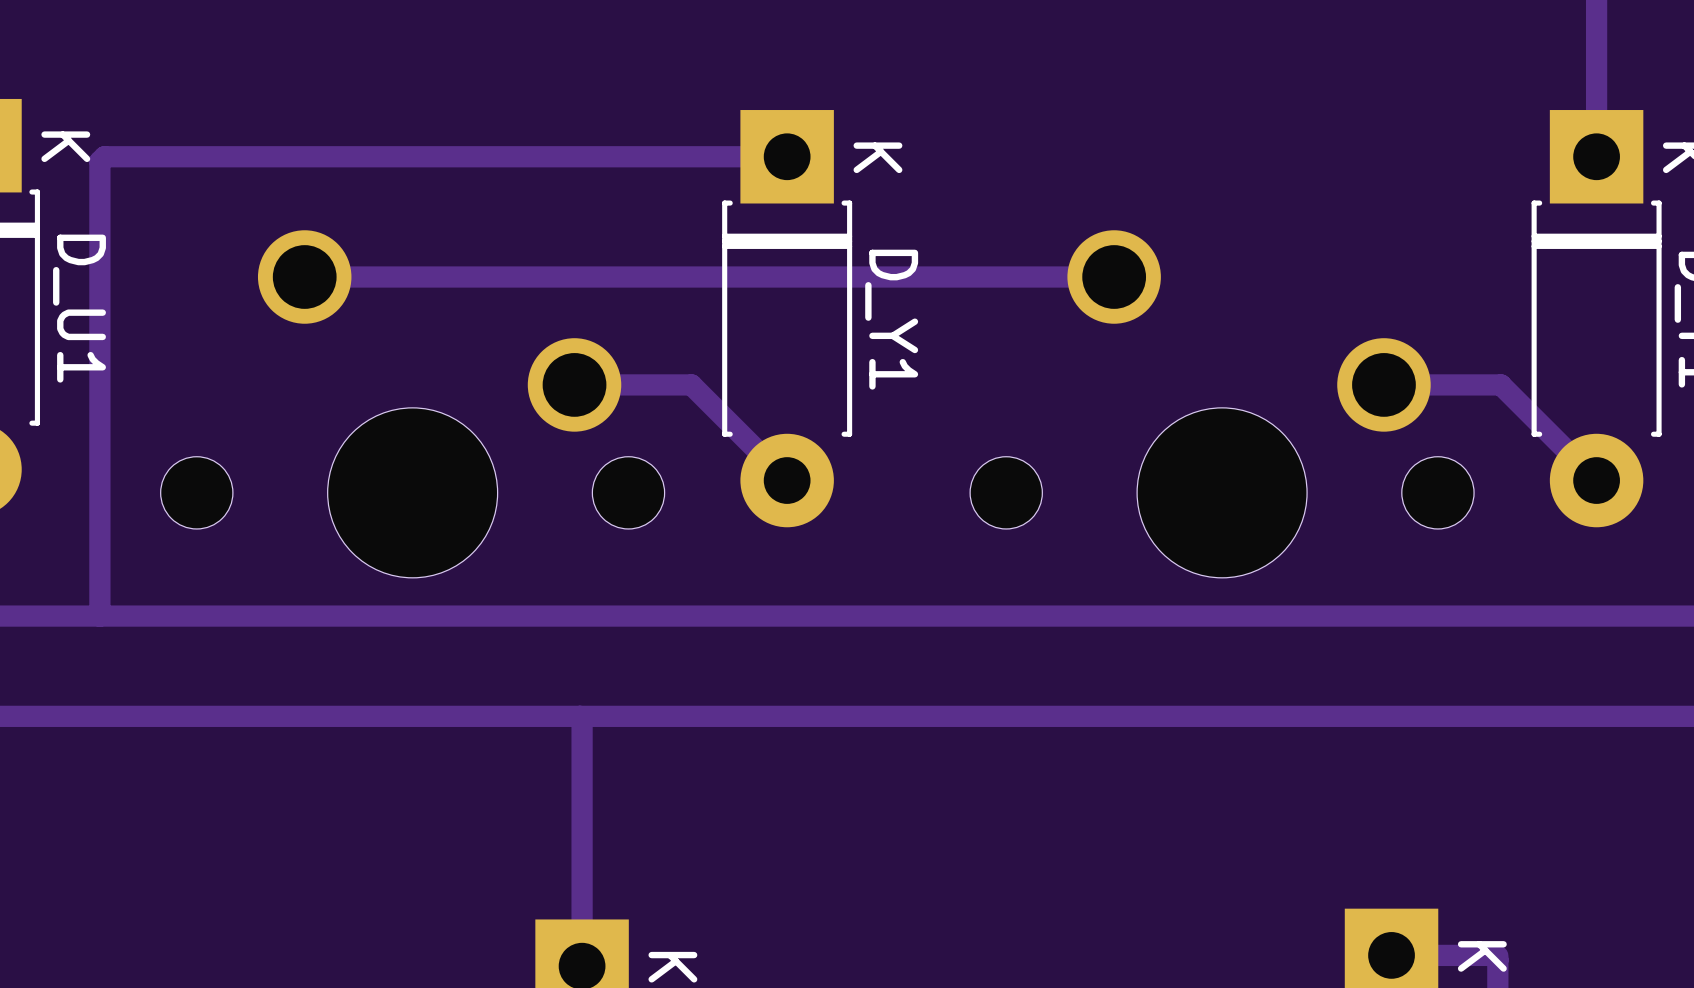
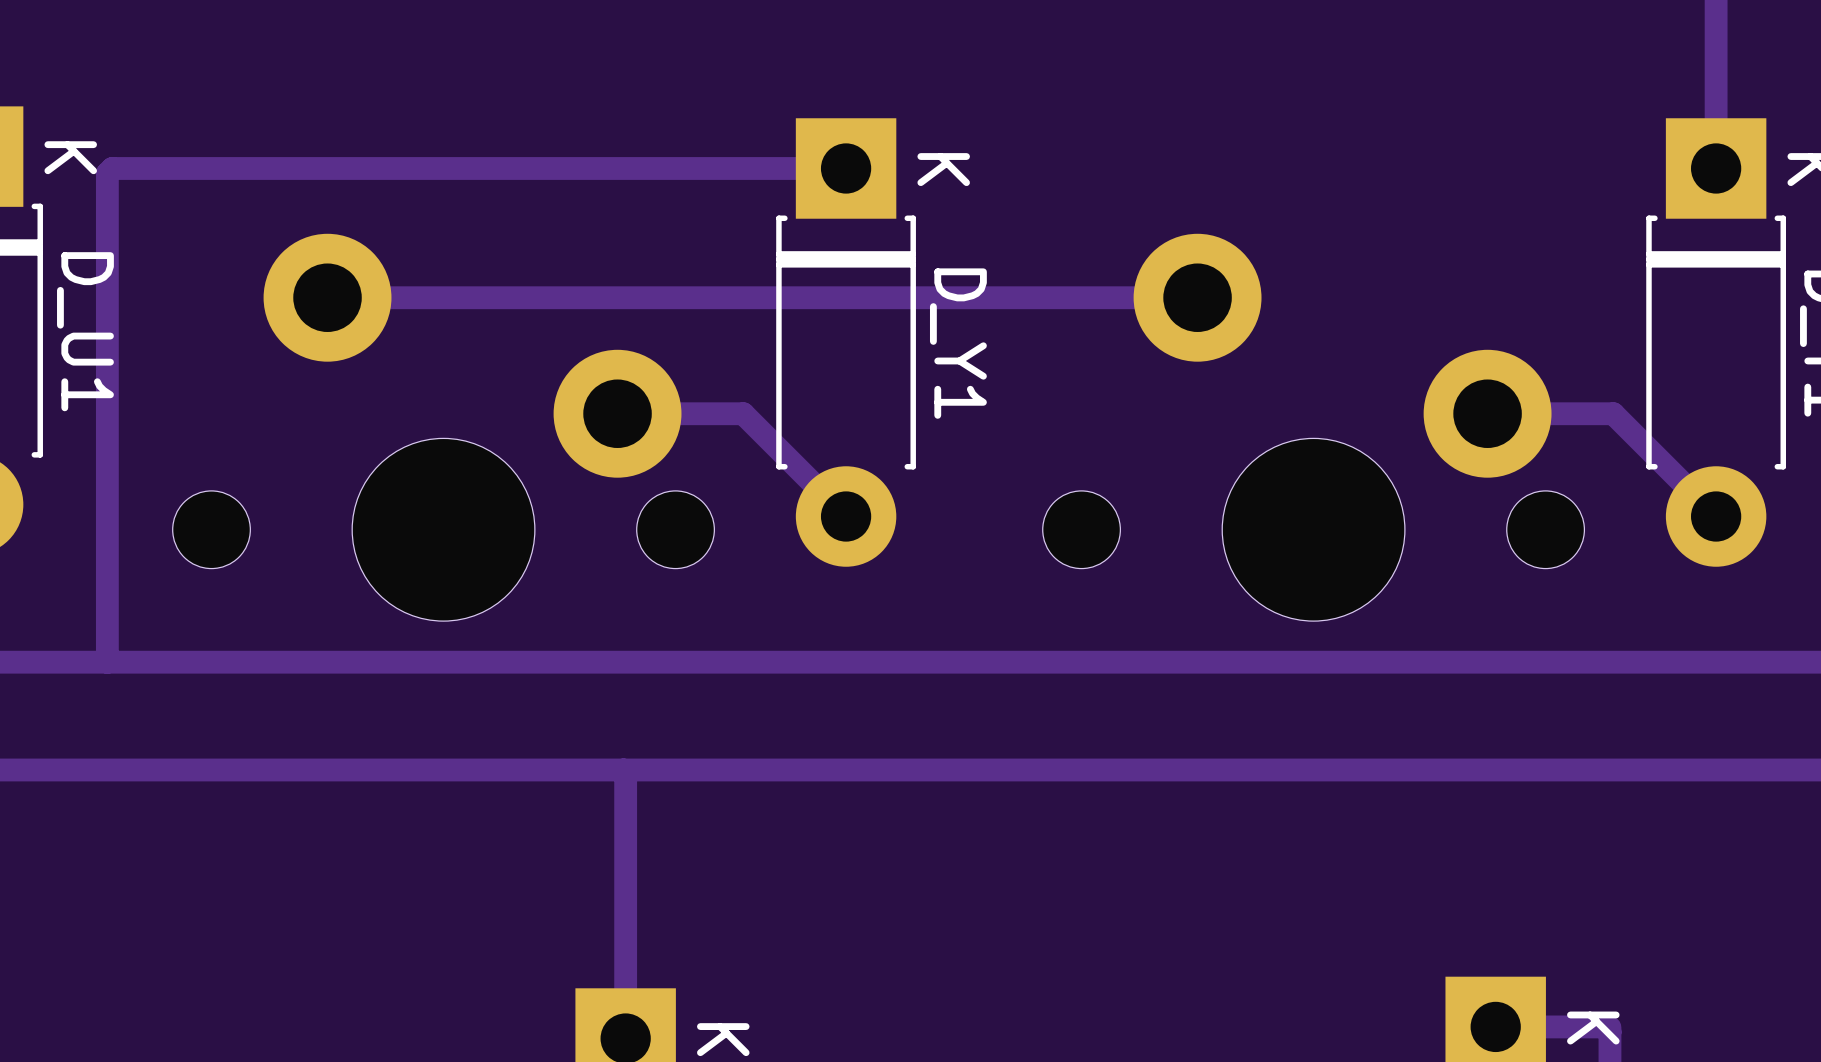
part footprint: [160, 230, 665, 578] -> [172, 233, 715, 622]
part footprint: [970, 230, 1475, 578] -> [1042, 233, 1585, 622]

